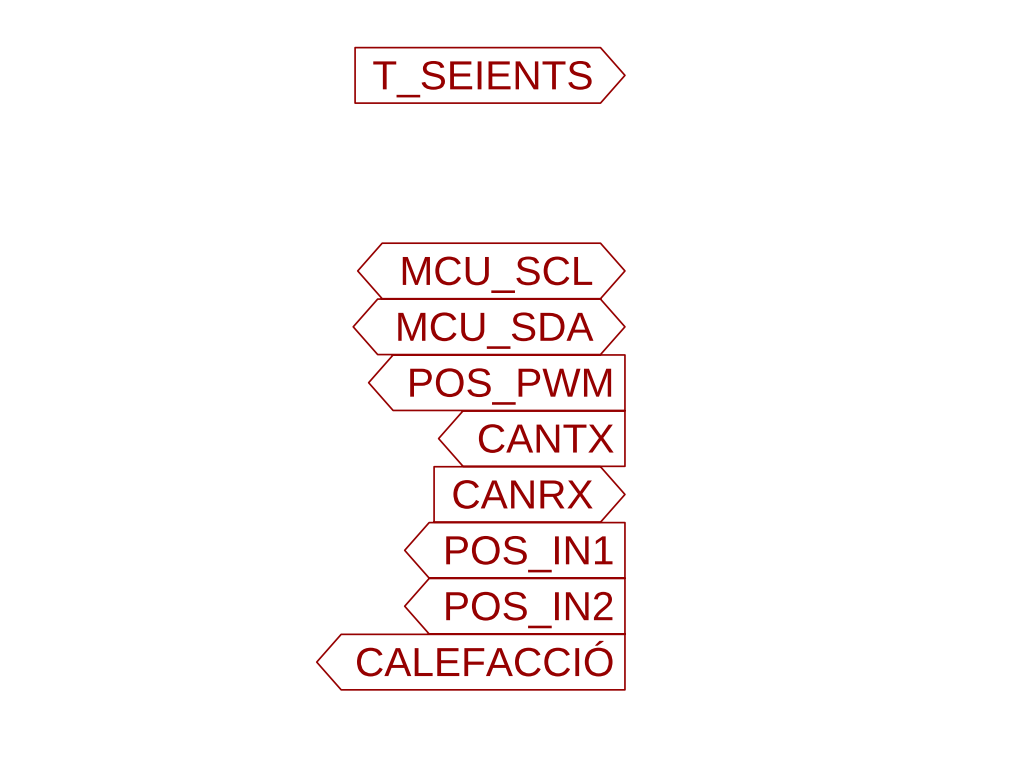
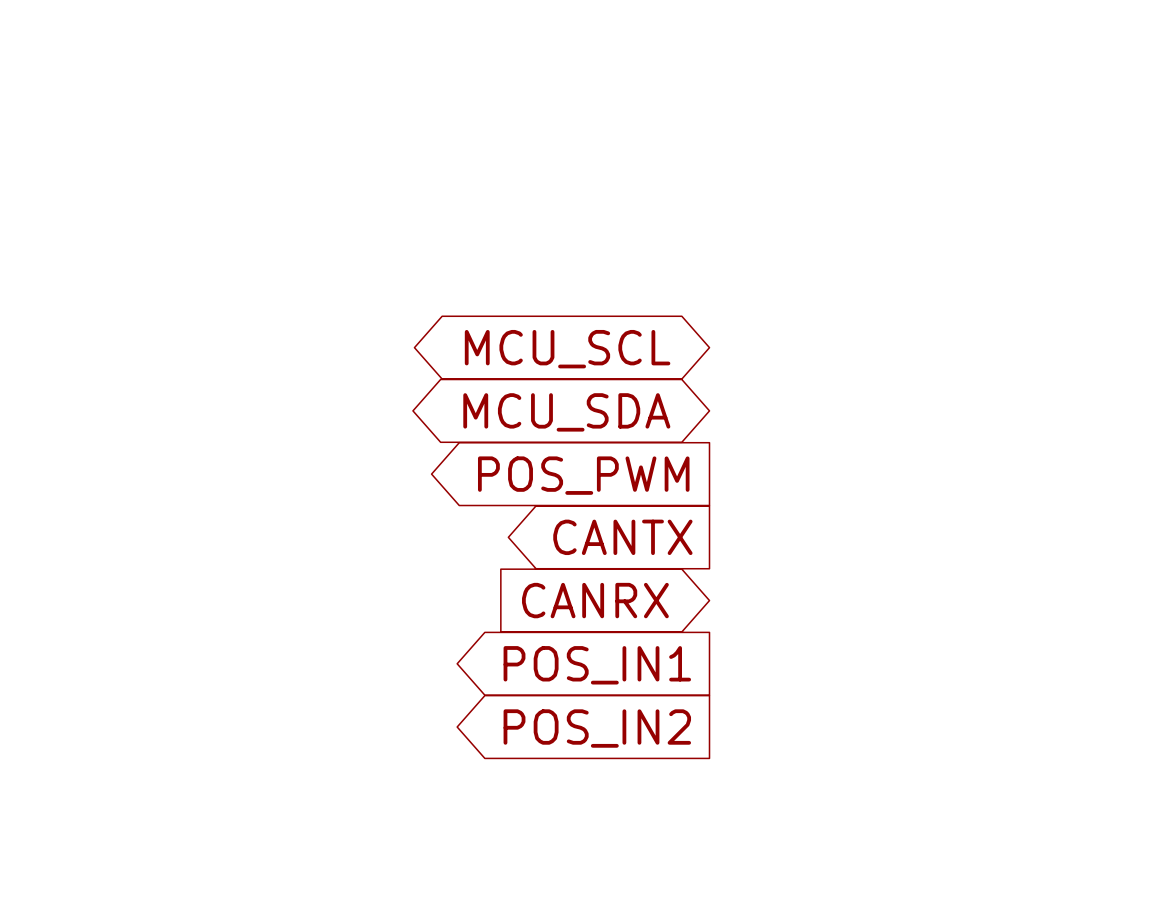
global label: T_SEIENTS (482, 79) -> none
global label: CALEFACCIÓ (484, 658) -> none

